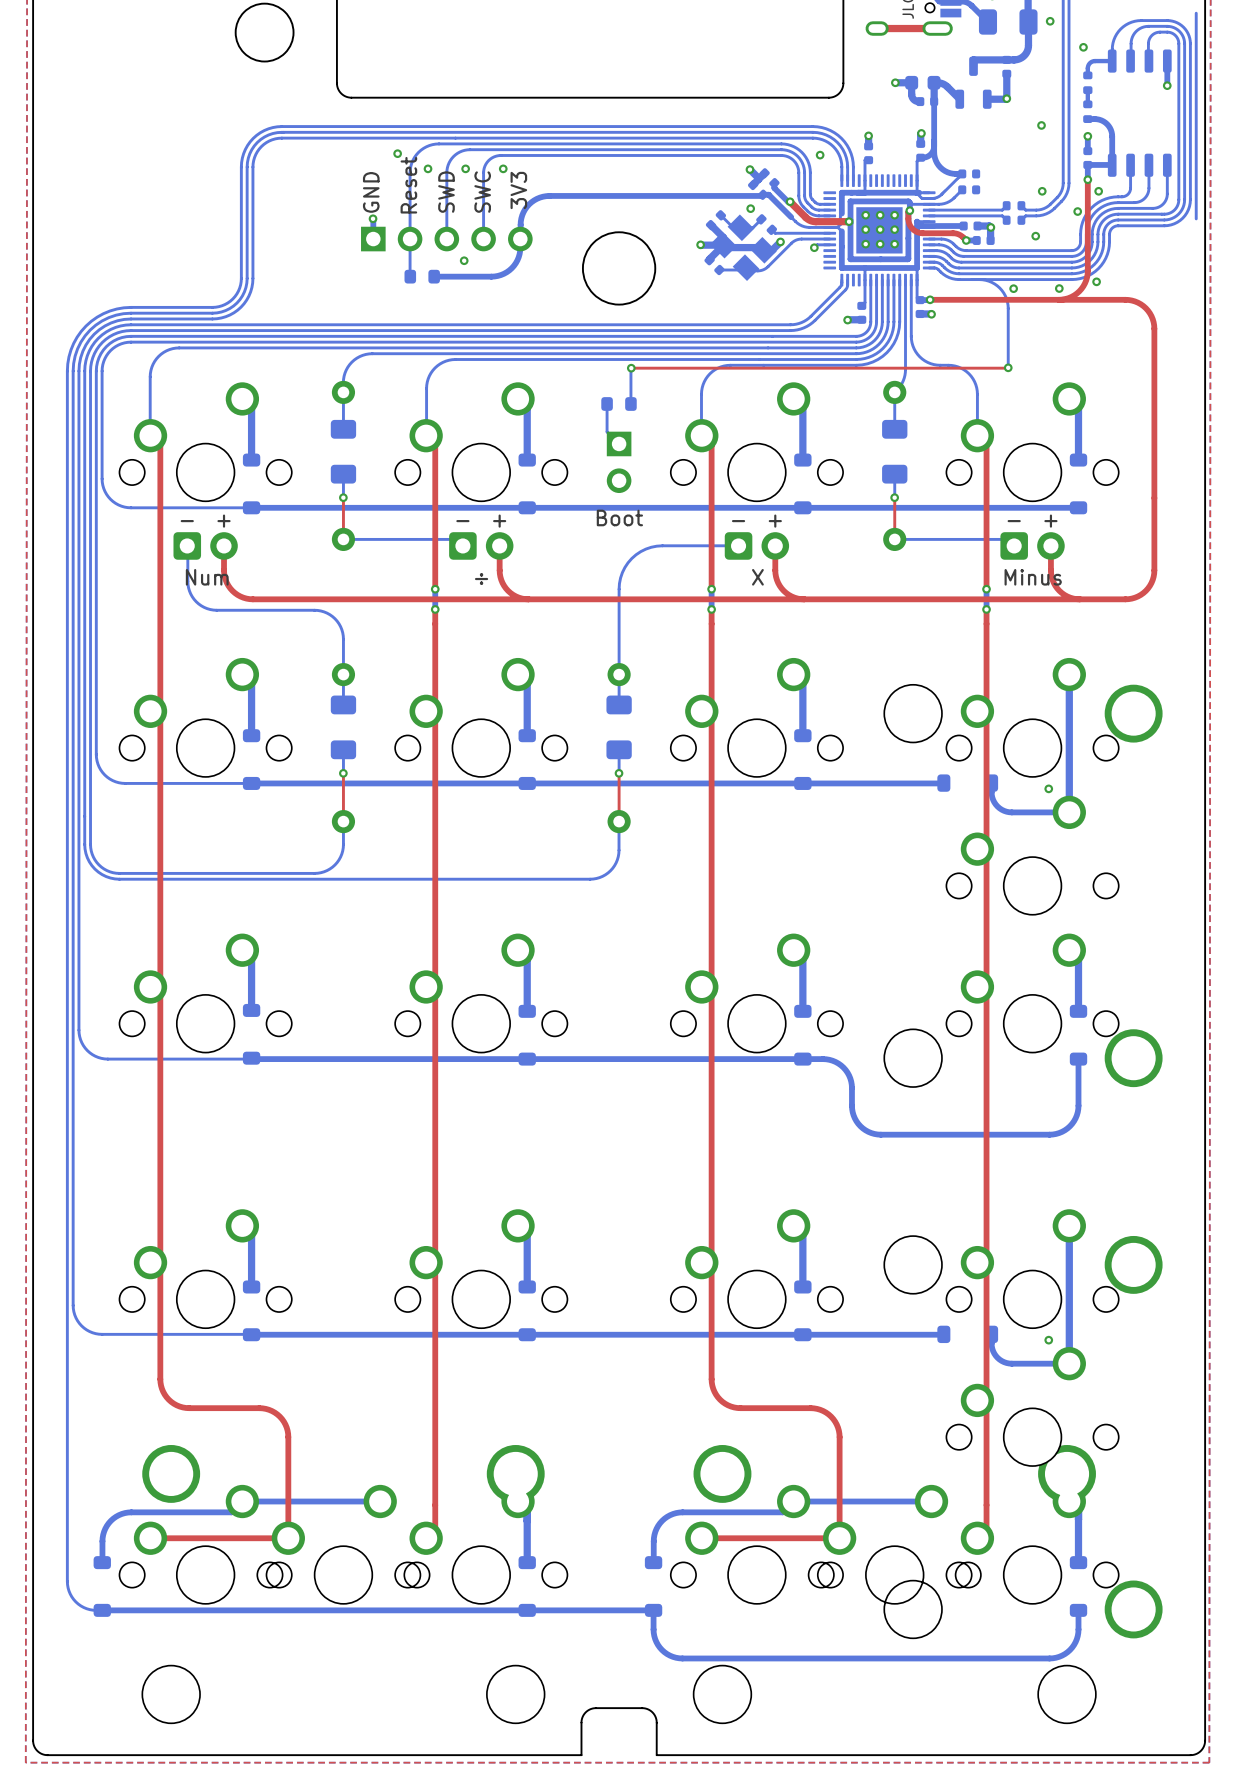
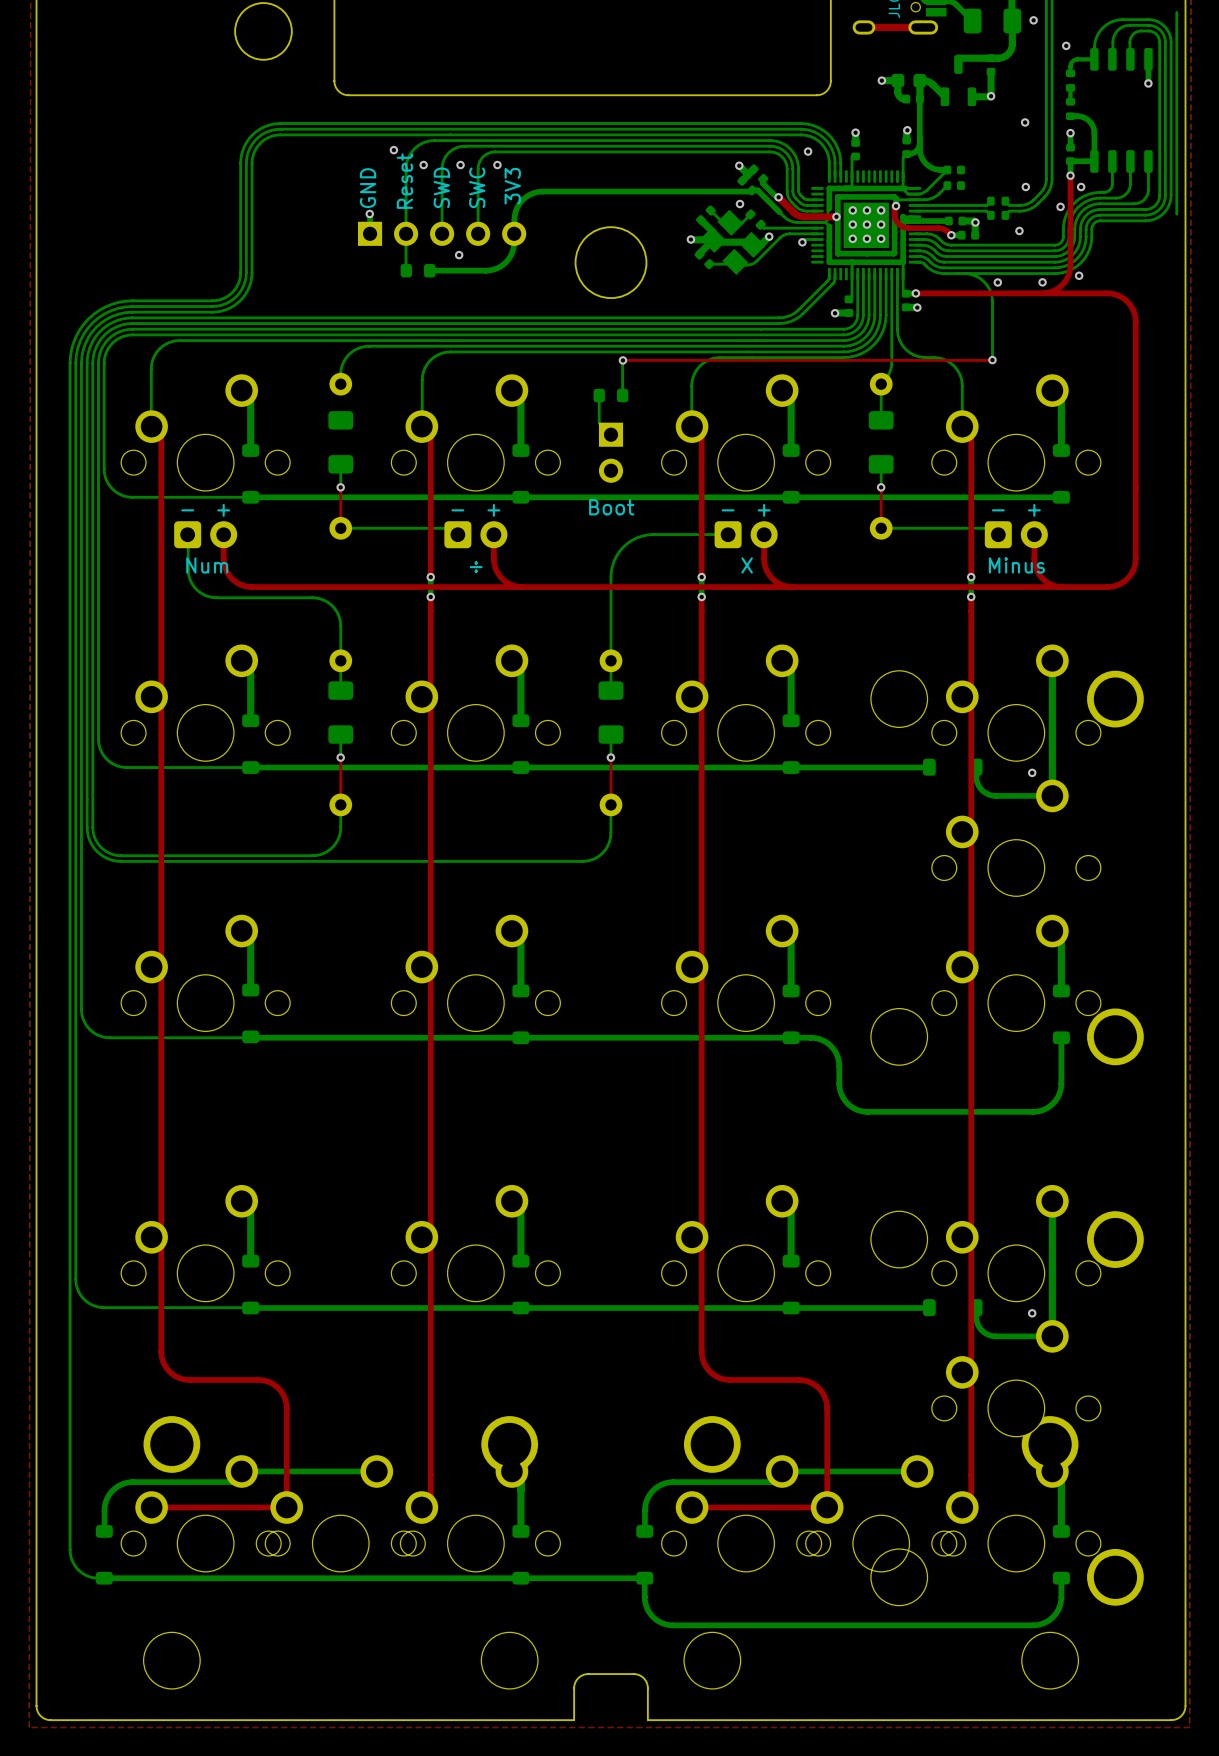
bottom track: (343, 392) (343, 429) -> none

